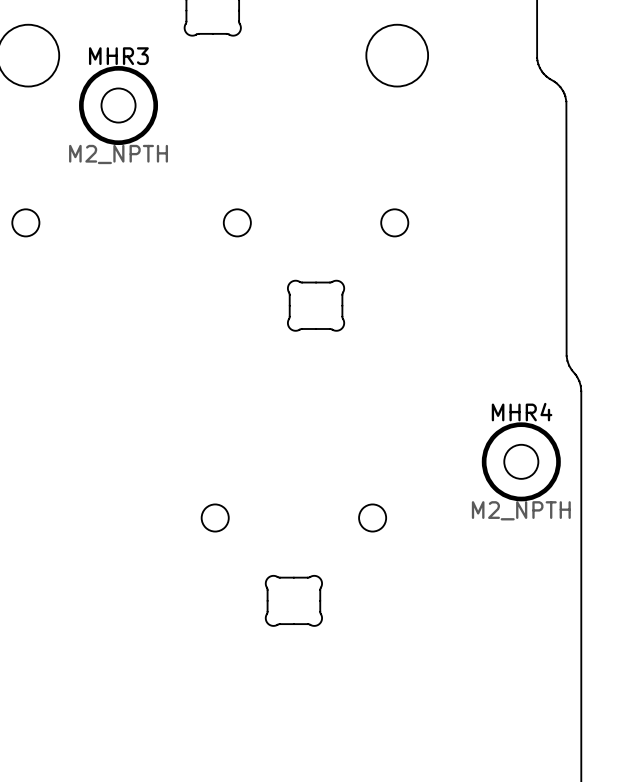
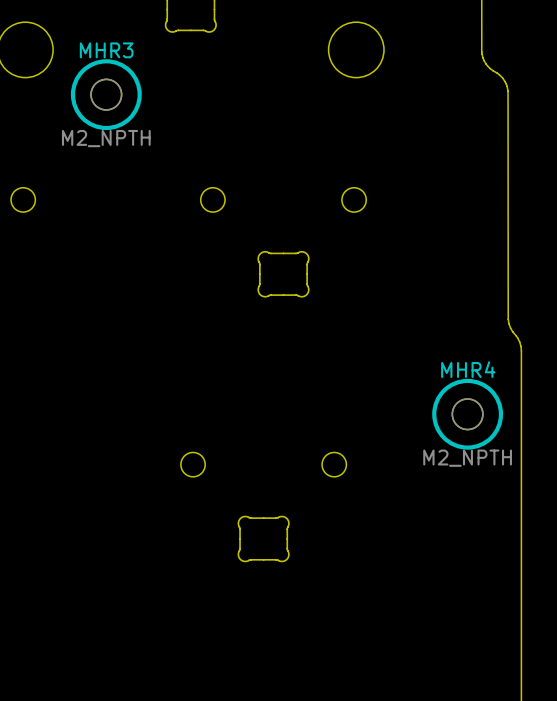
MHR3 footprint: [79, 66, 159, 146] -> [70, 59, 142, 131]
MHR4 footprint: [481, 422, 561, 502] -> [432, 378, 504, 450]

